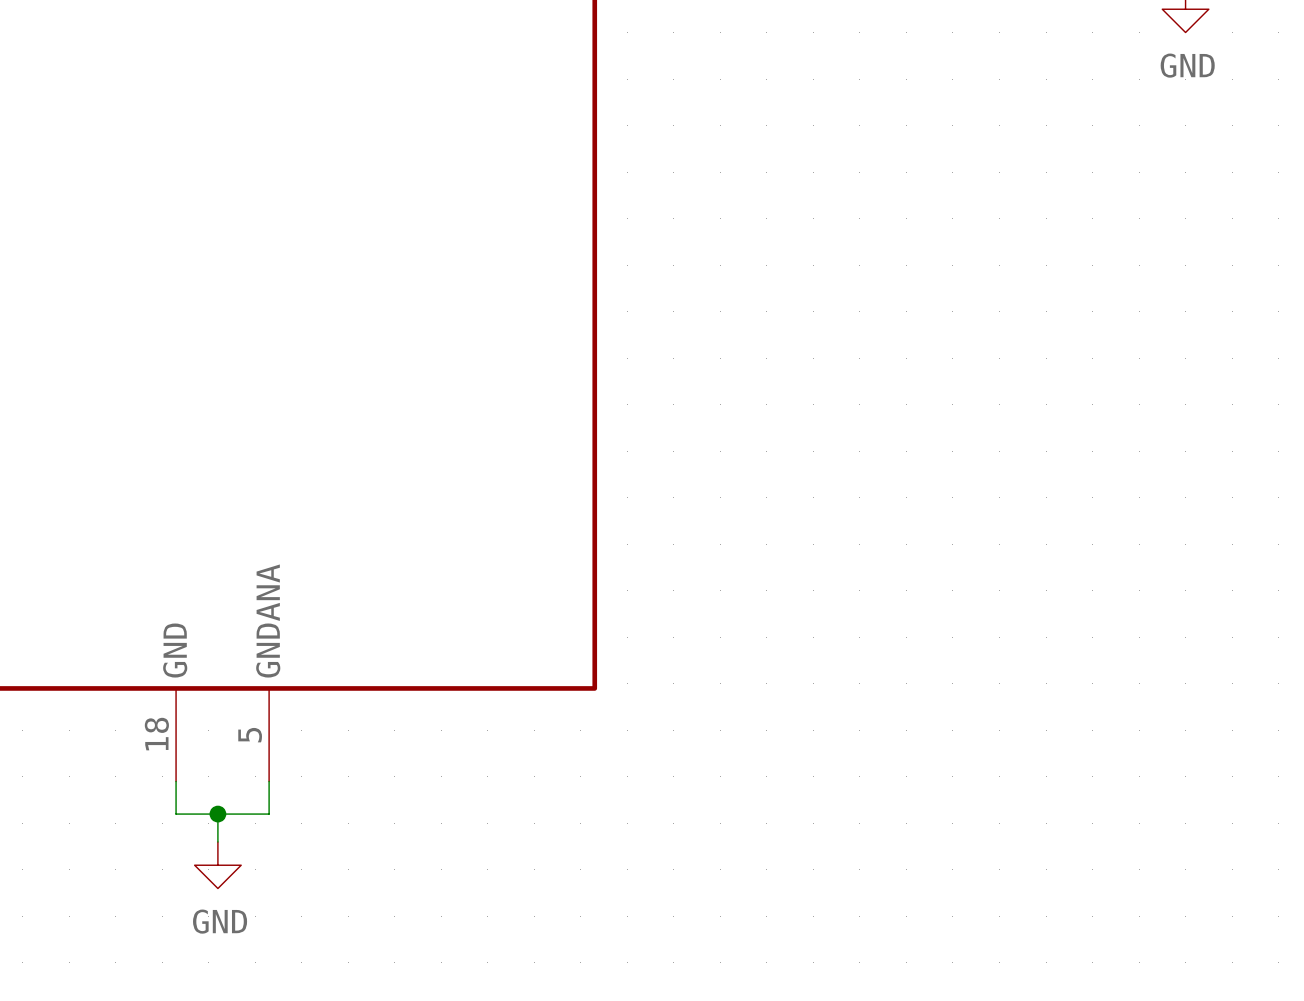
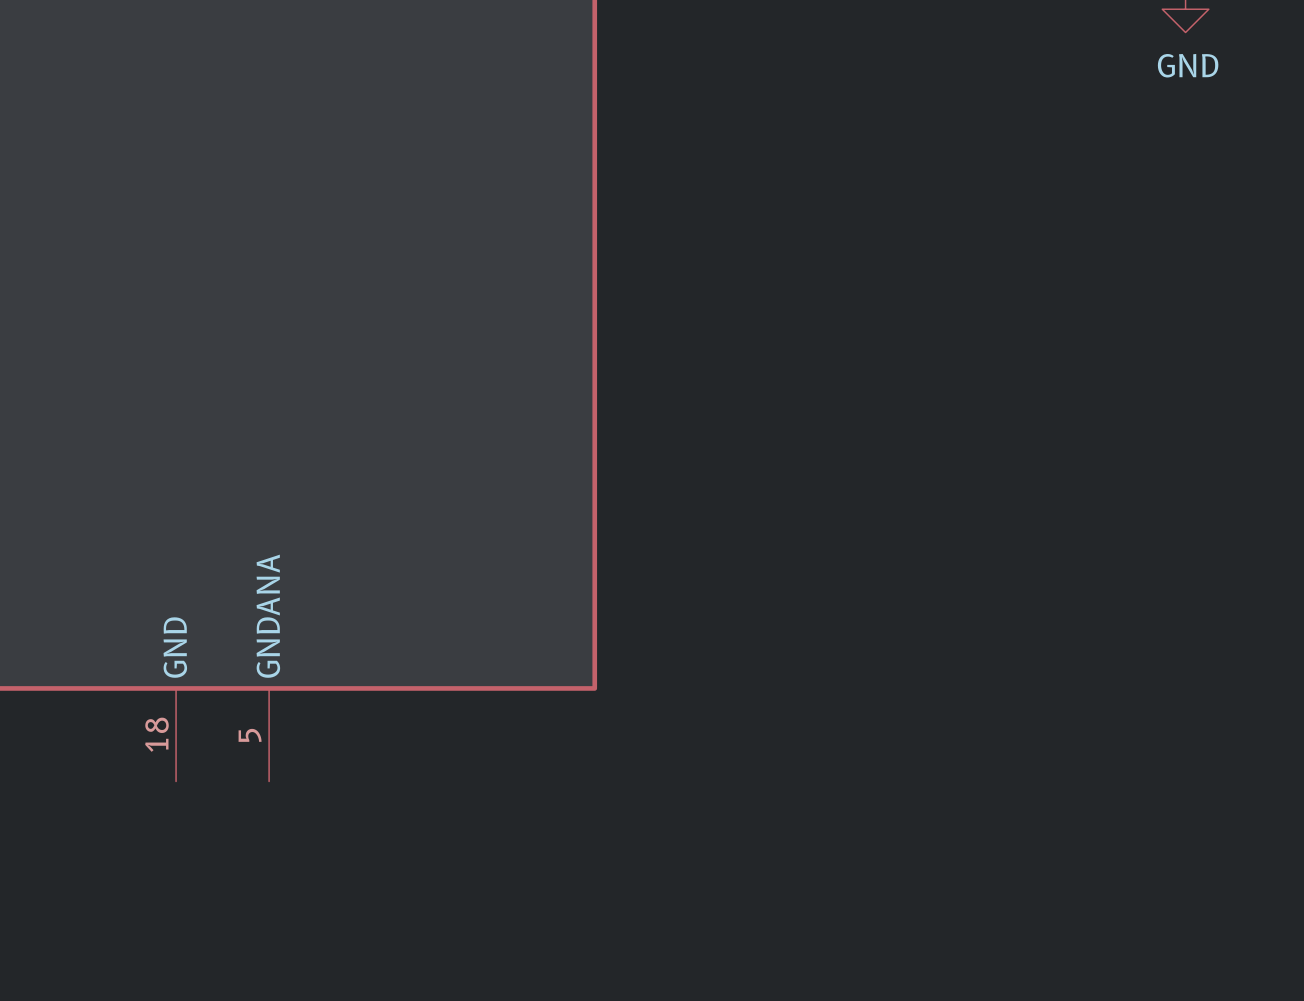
wire: (176, 781) (176, 814) (269, 814) (269, 781) -> none
wire: (217, 814) (217, 841) -> none
junction: (217, 814) -> none
power symbol: GND (217, 865) -> none

